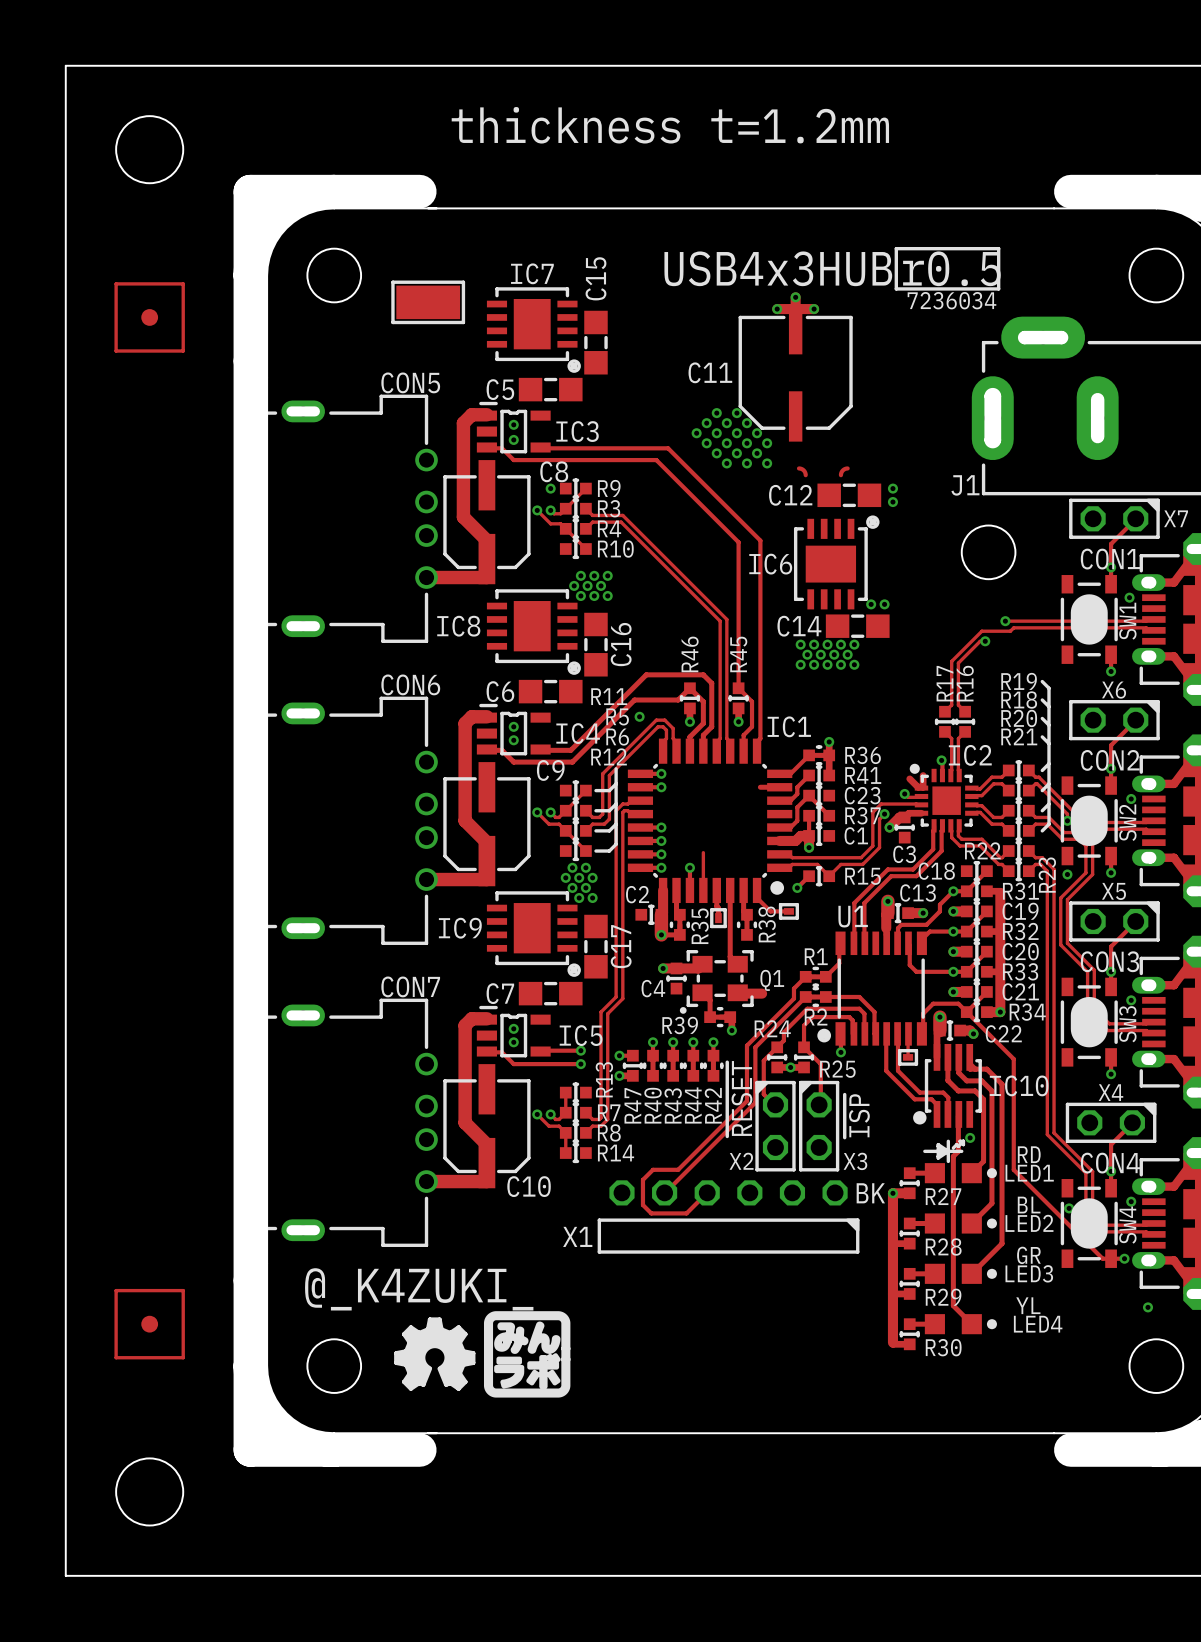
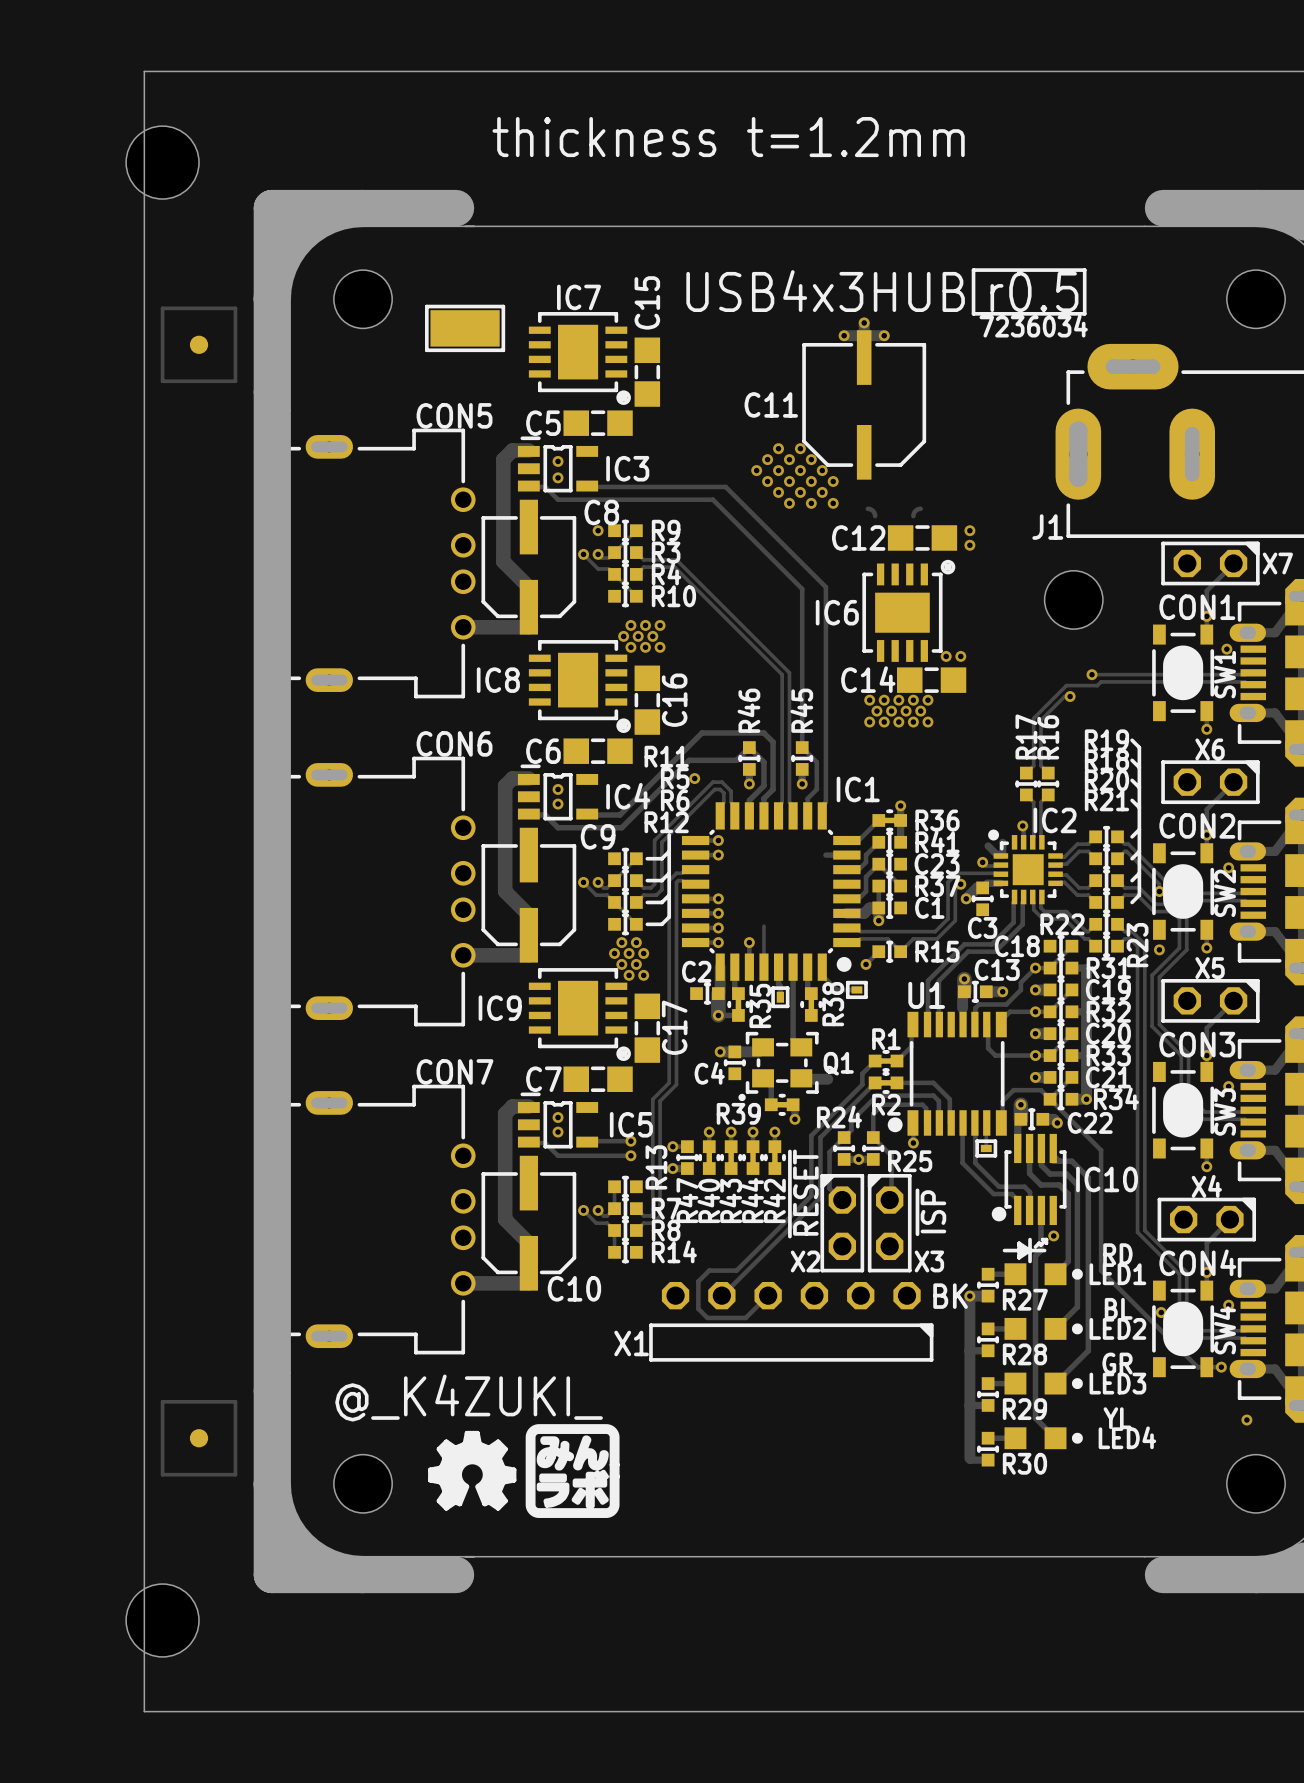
board edge: (132, 65) (65, 65) (65, 1575) (132, 1575) -> (144, 71) (144, 1711)
part position: (149, 317) -> (199, 344)
part position: (149, 1324) -> (199, 1438)

